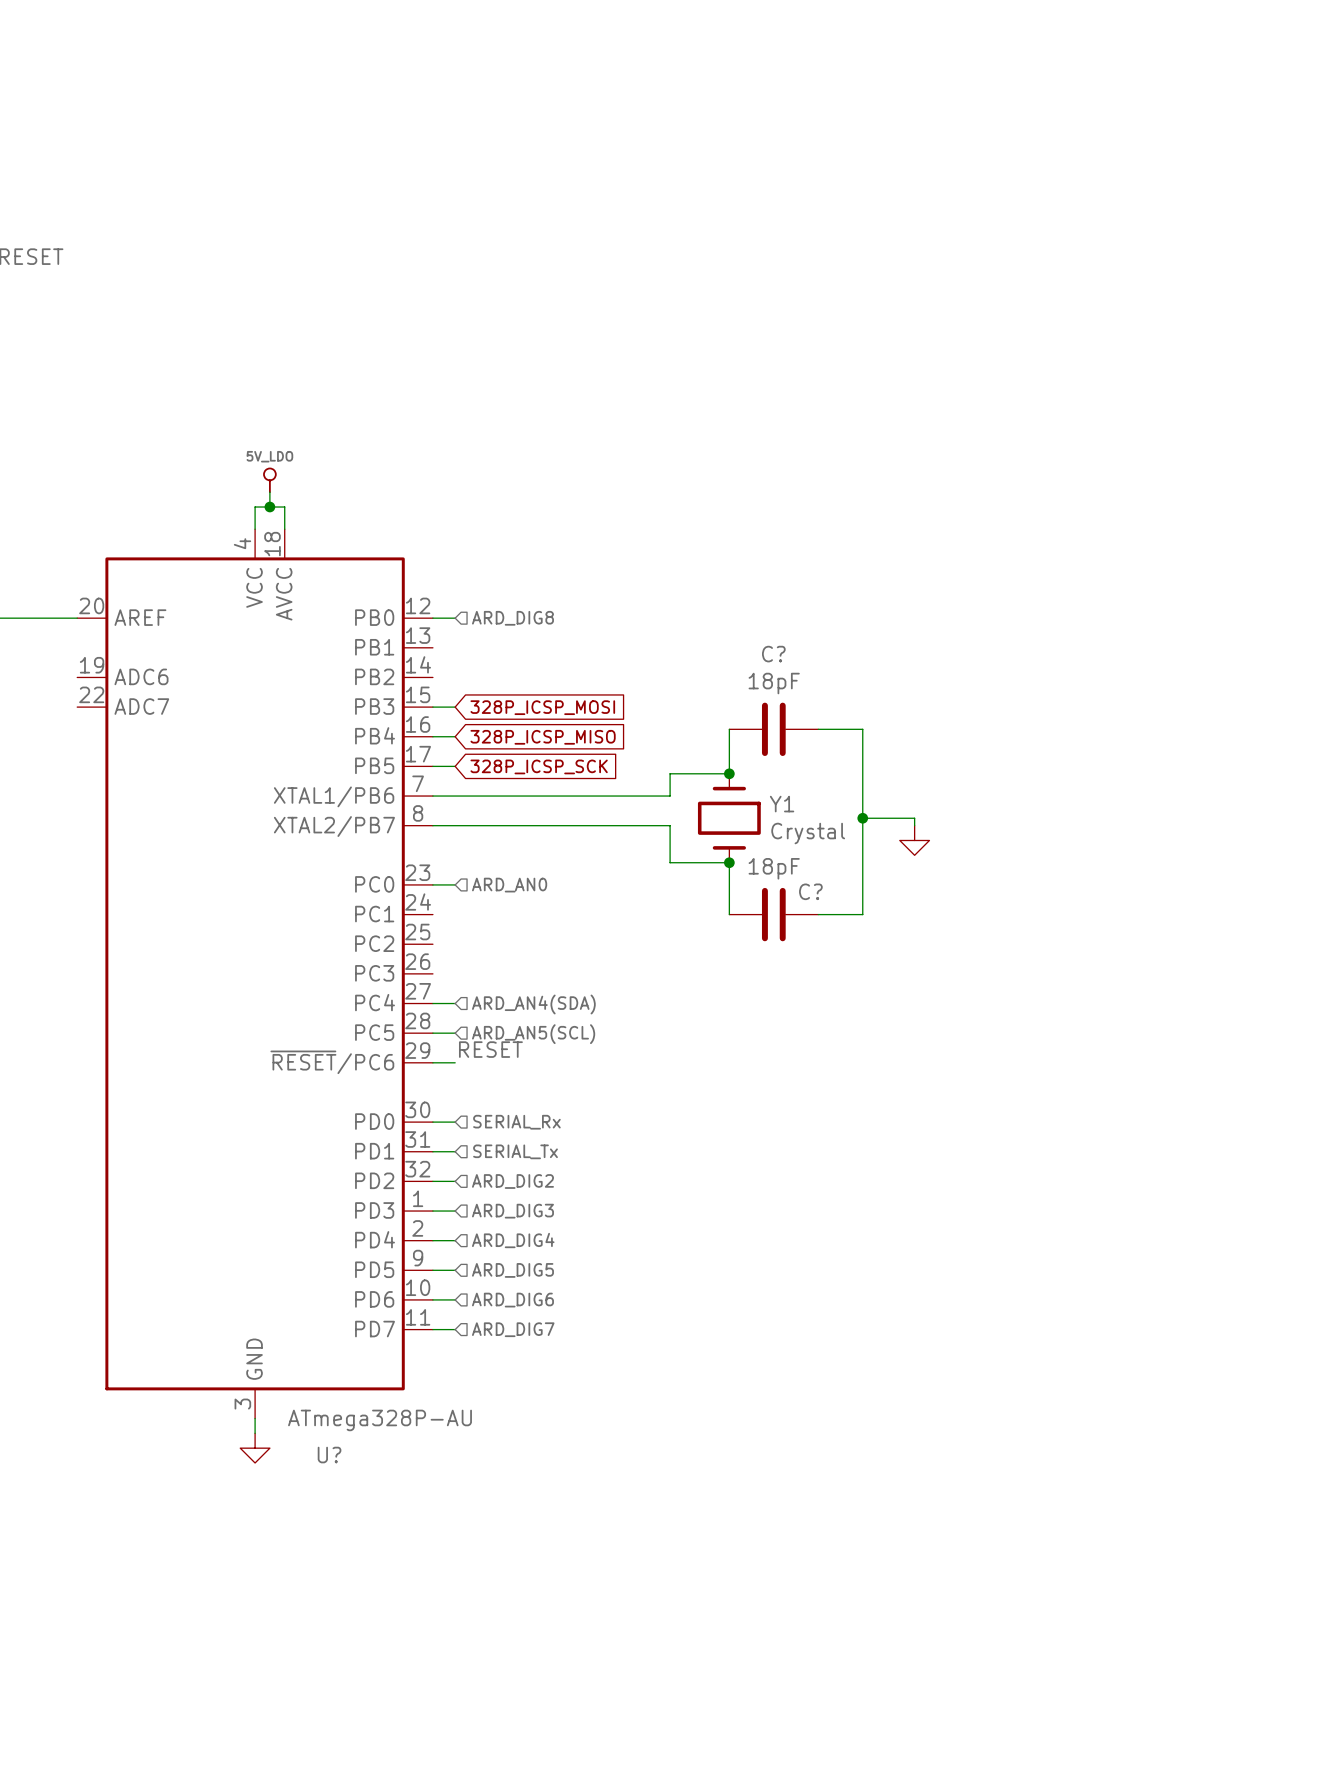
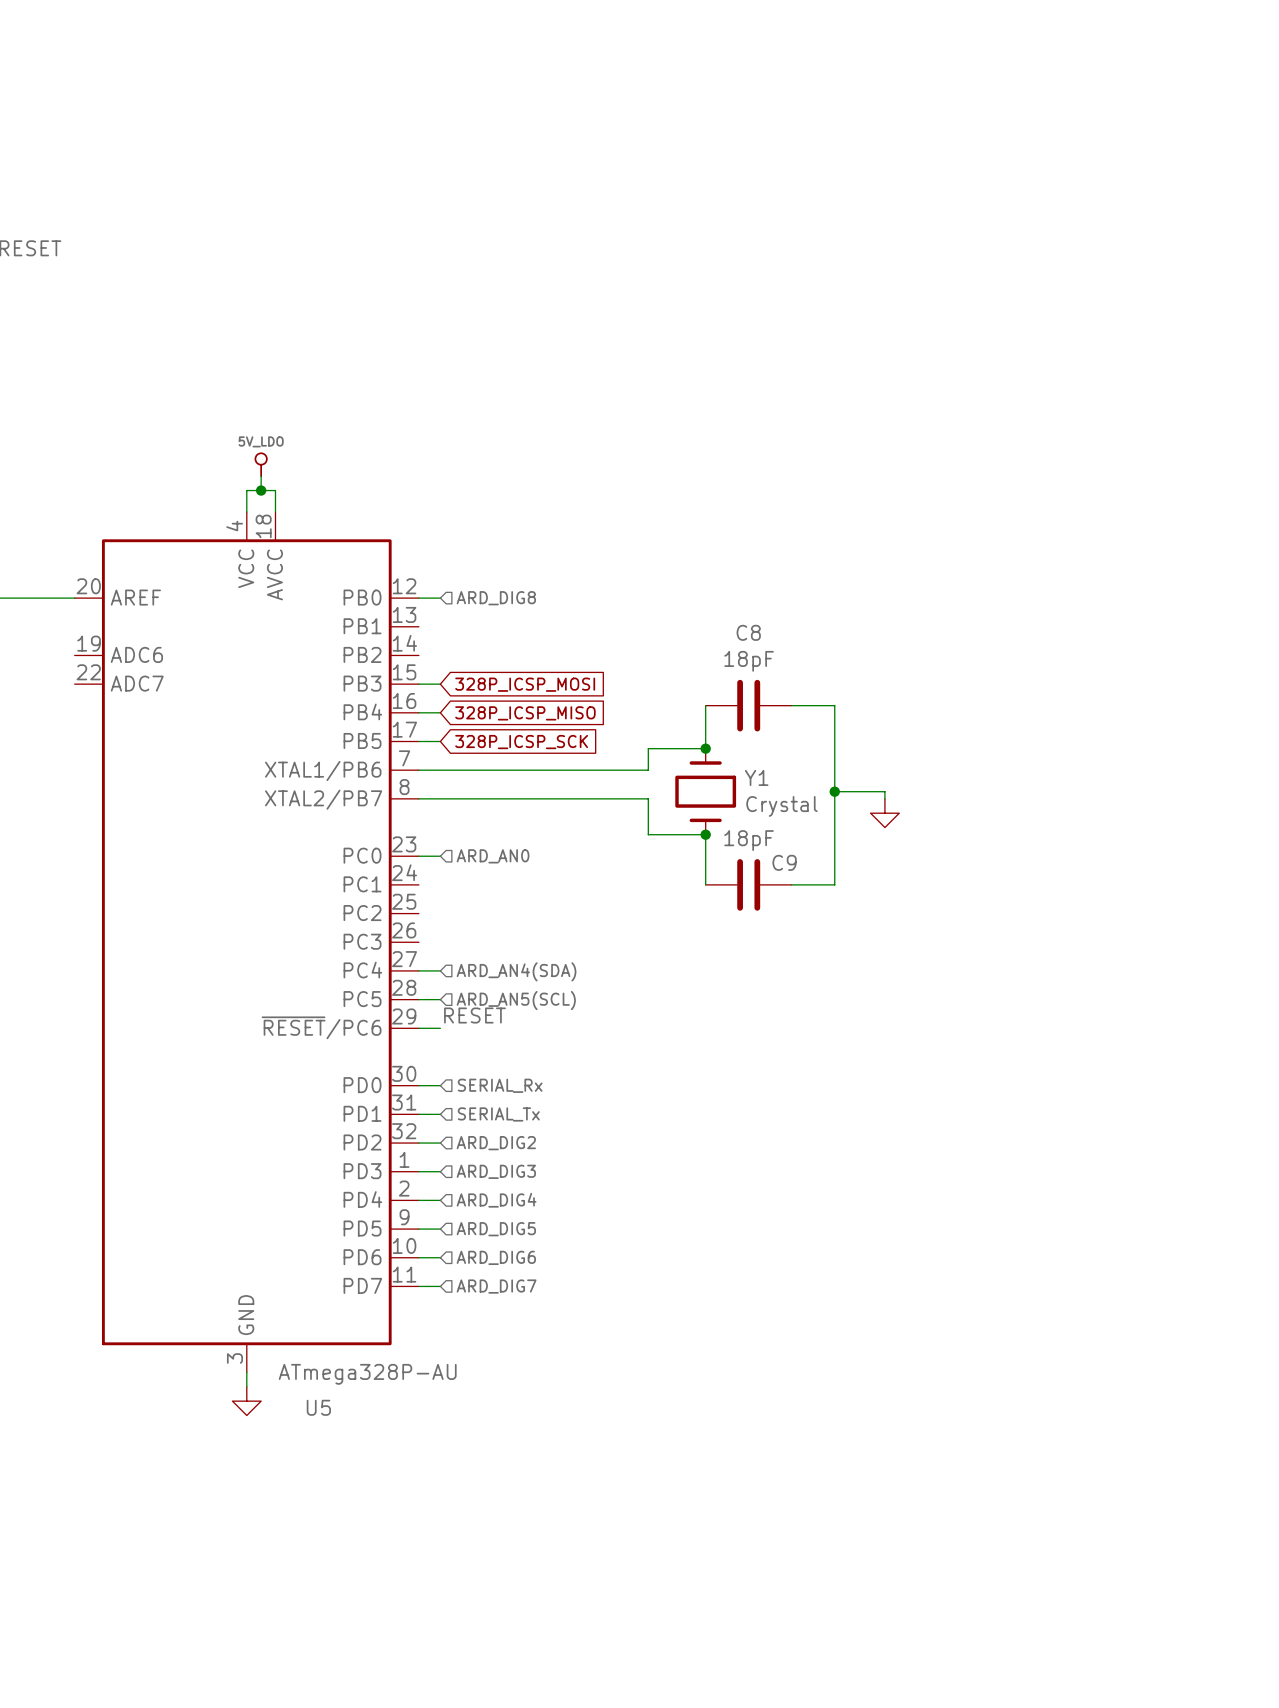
C? name: C? (773, 654) -> C8 (748, 632)
C? name: C? (810, 891) -> C9 (784, 862)
U? name: U? (329, 1455) -> U5 (318, 1407)

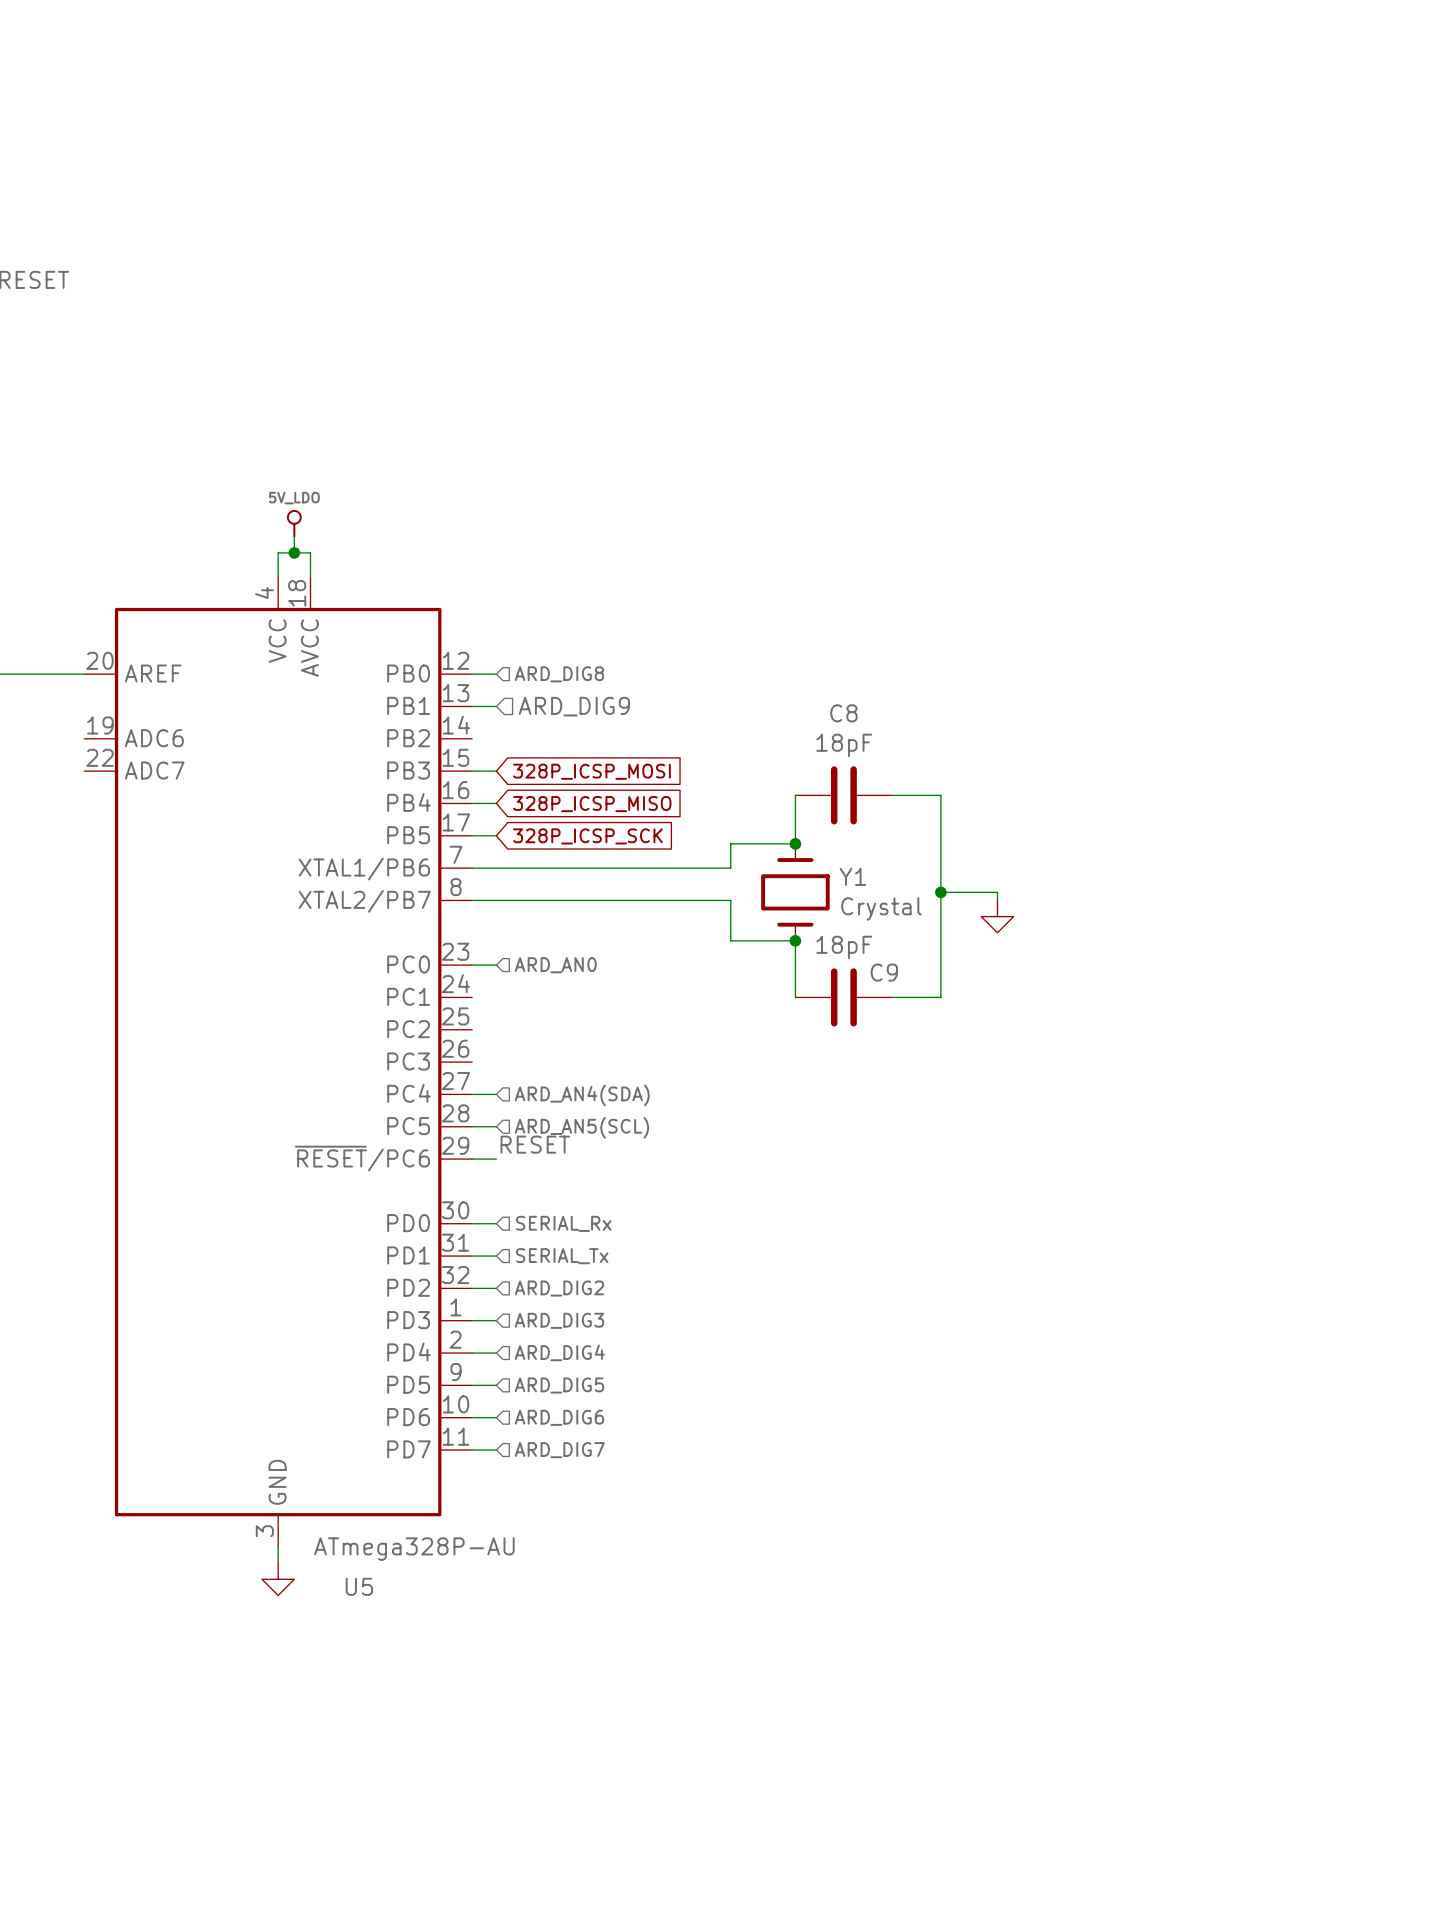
wire: none -> (472, 706) (496, 706)
hierarchical label: none -> ARD_DIG9 (574, 706)

